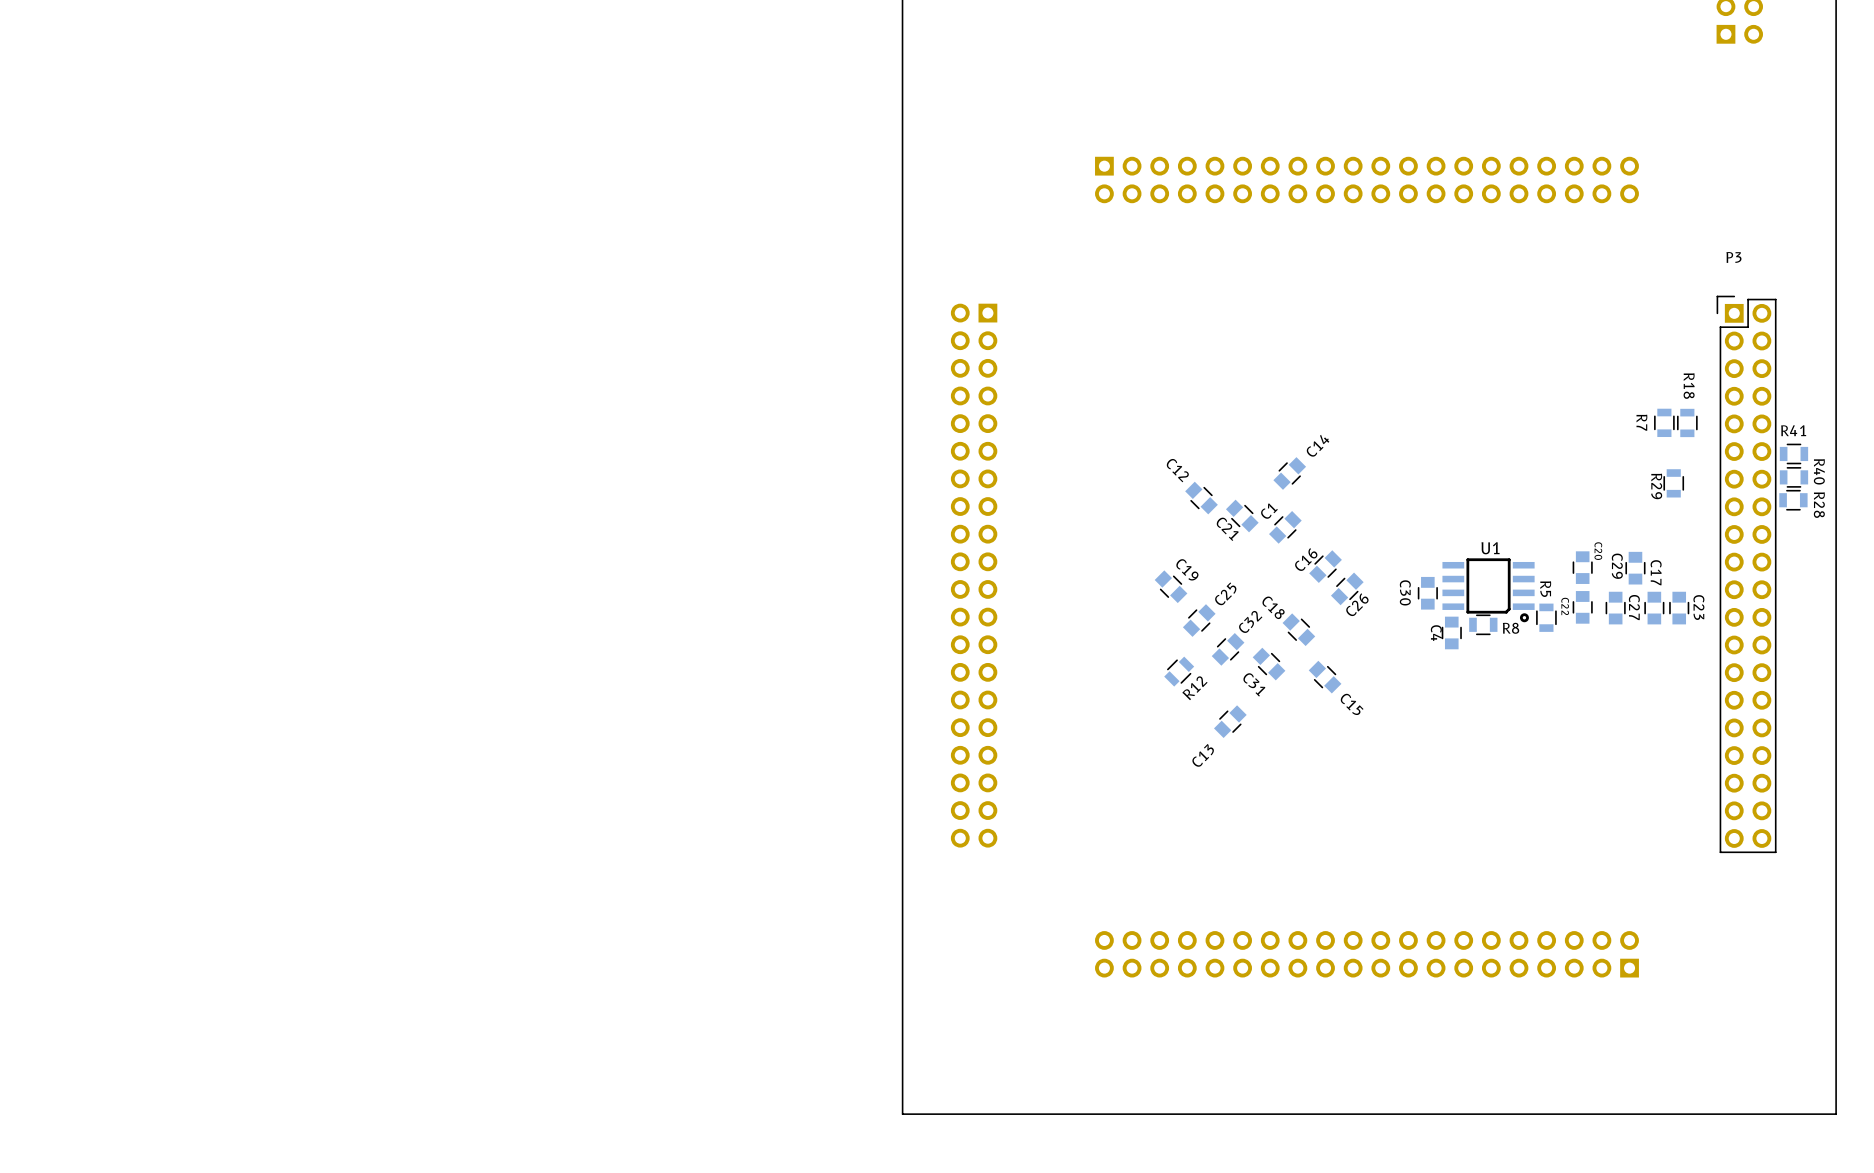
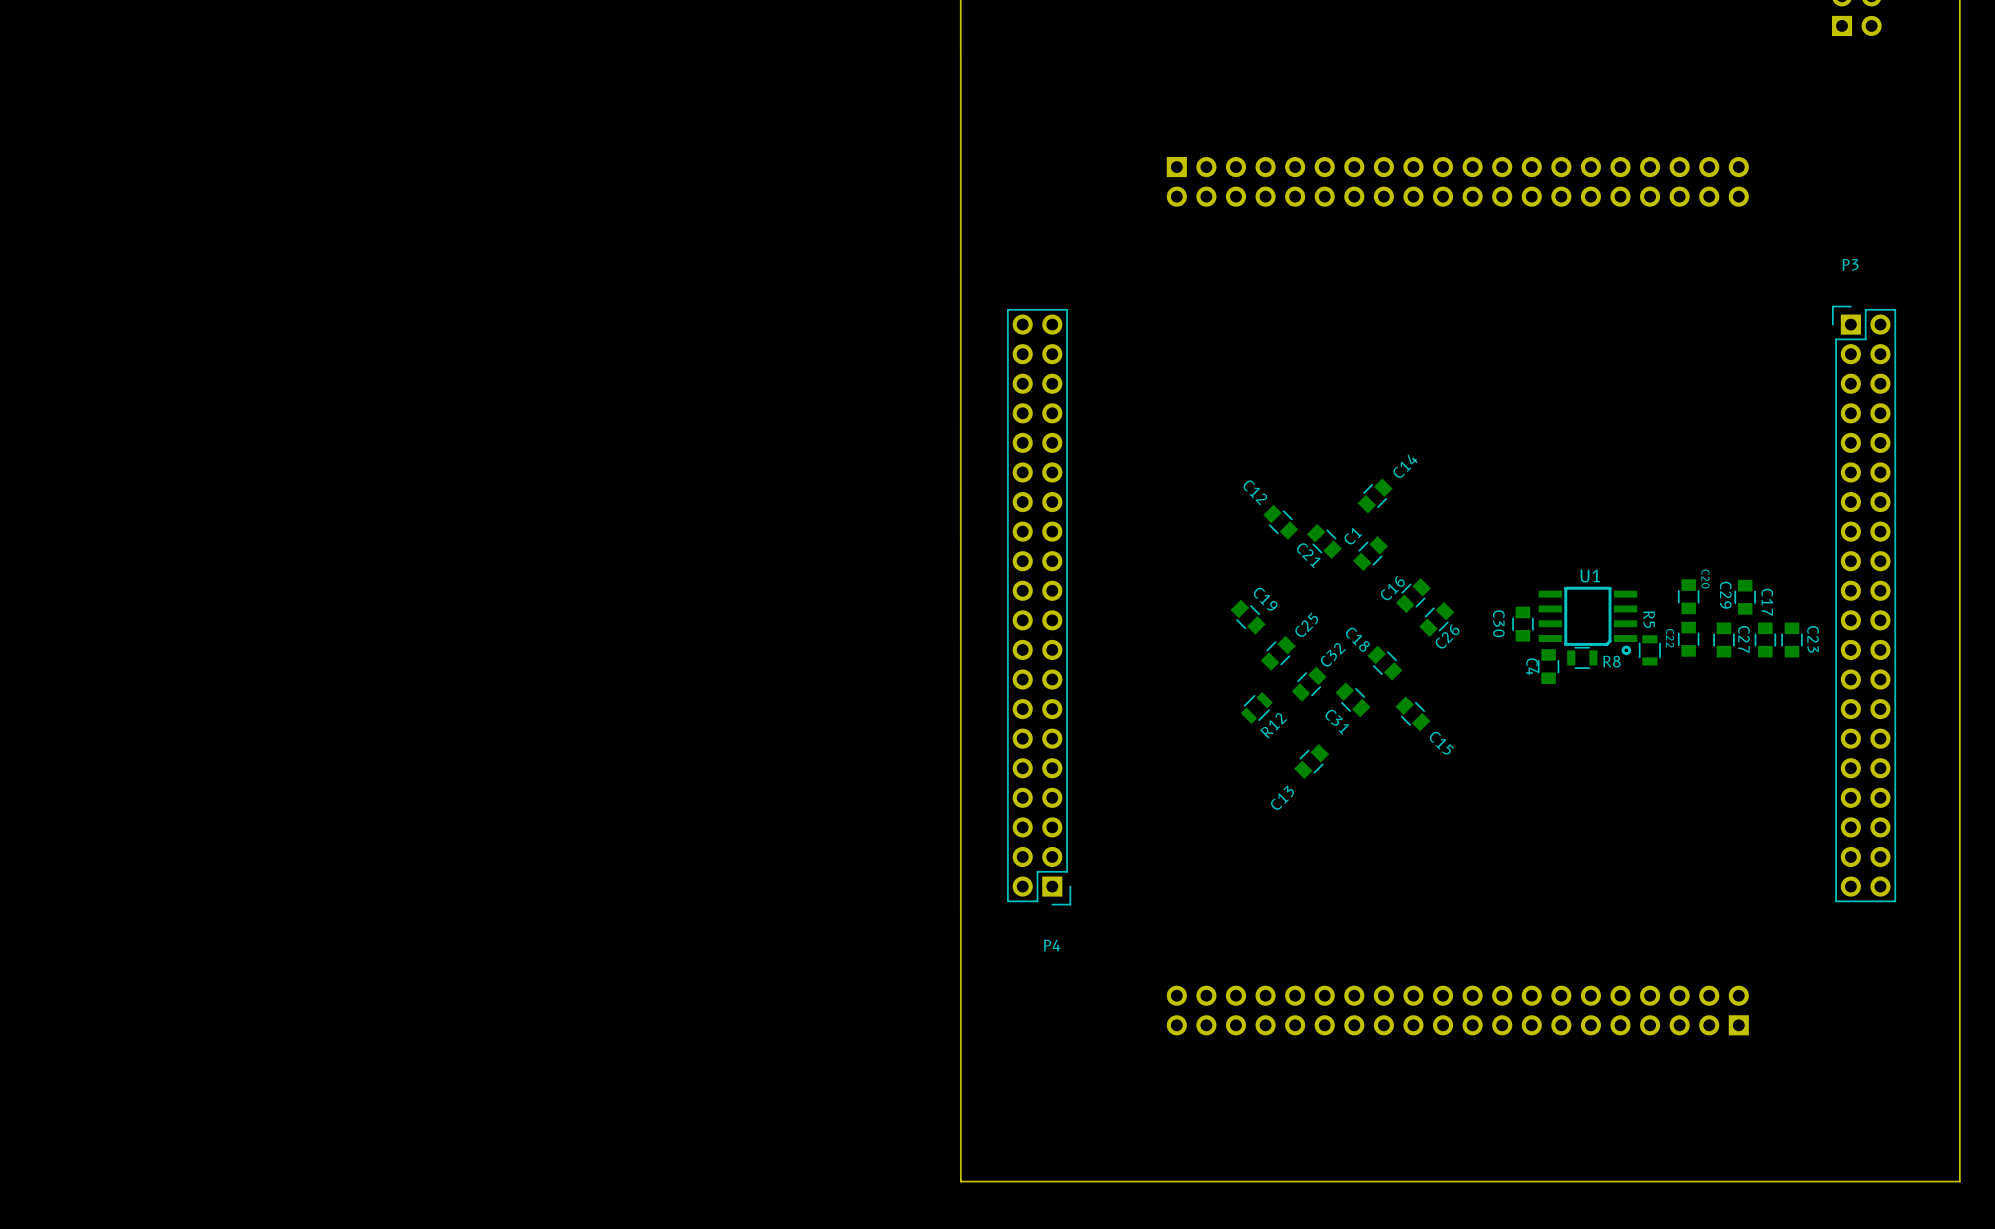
R7: (1664, 422) -> none
R18: (1687, 422) -> none
R41: (1793, 453) -> none
R40: (1793, 477) -> none
R29: (1673, 483) -> none
R28: (1793, 500) -> none
P4 side: top (974, 575) -> bottom (1039, 607)

